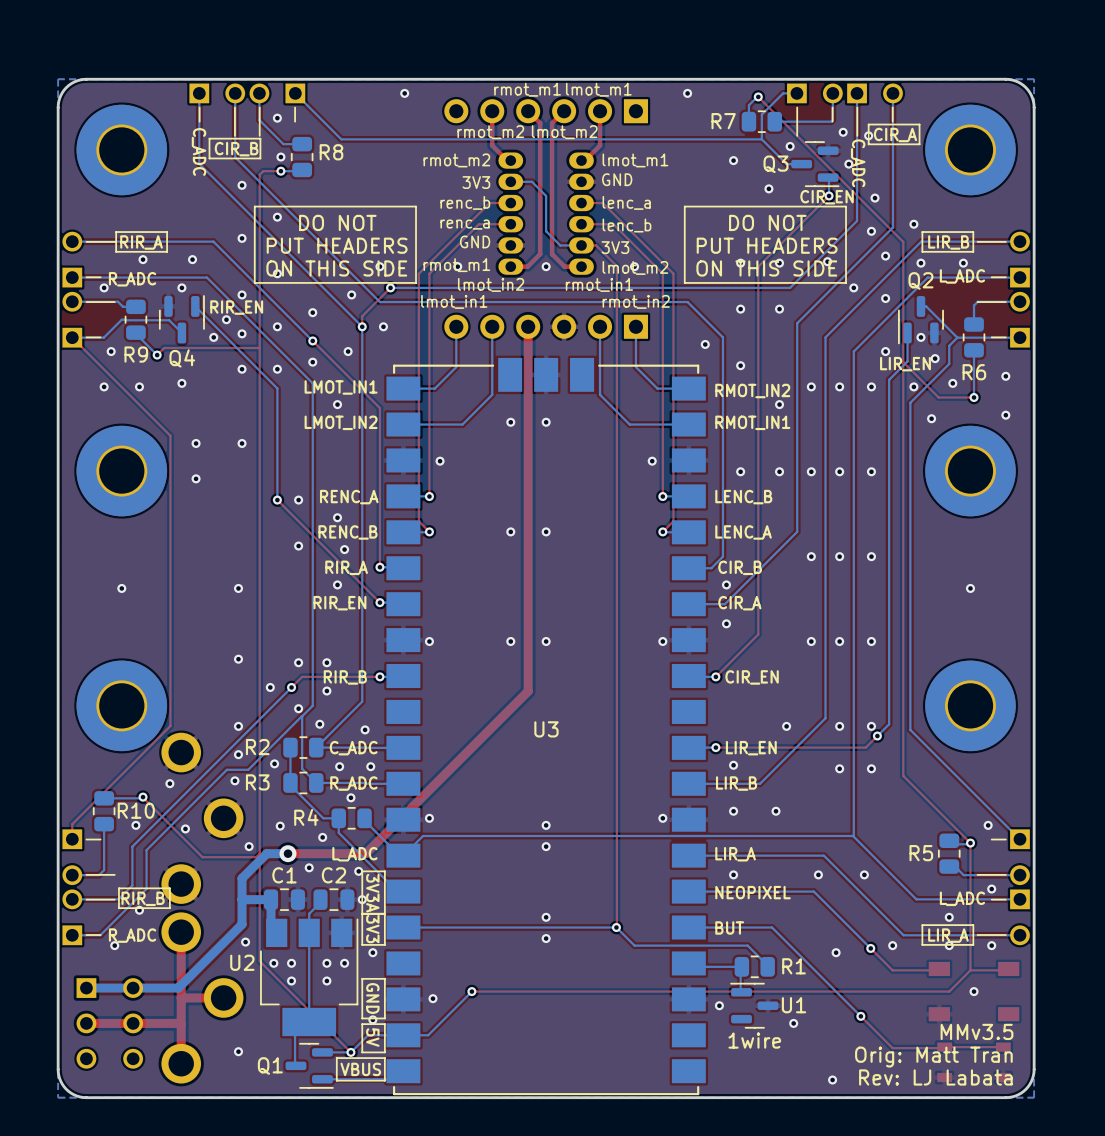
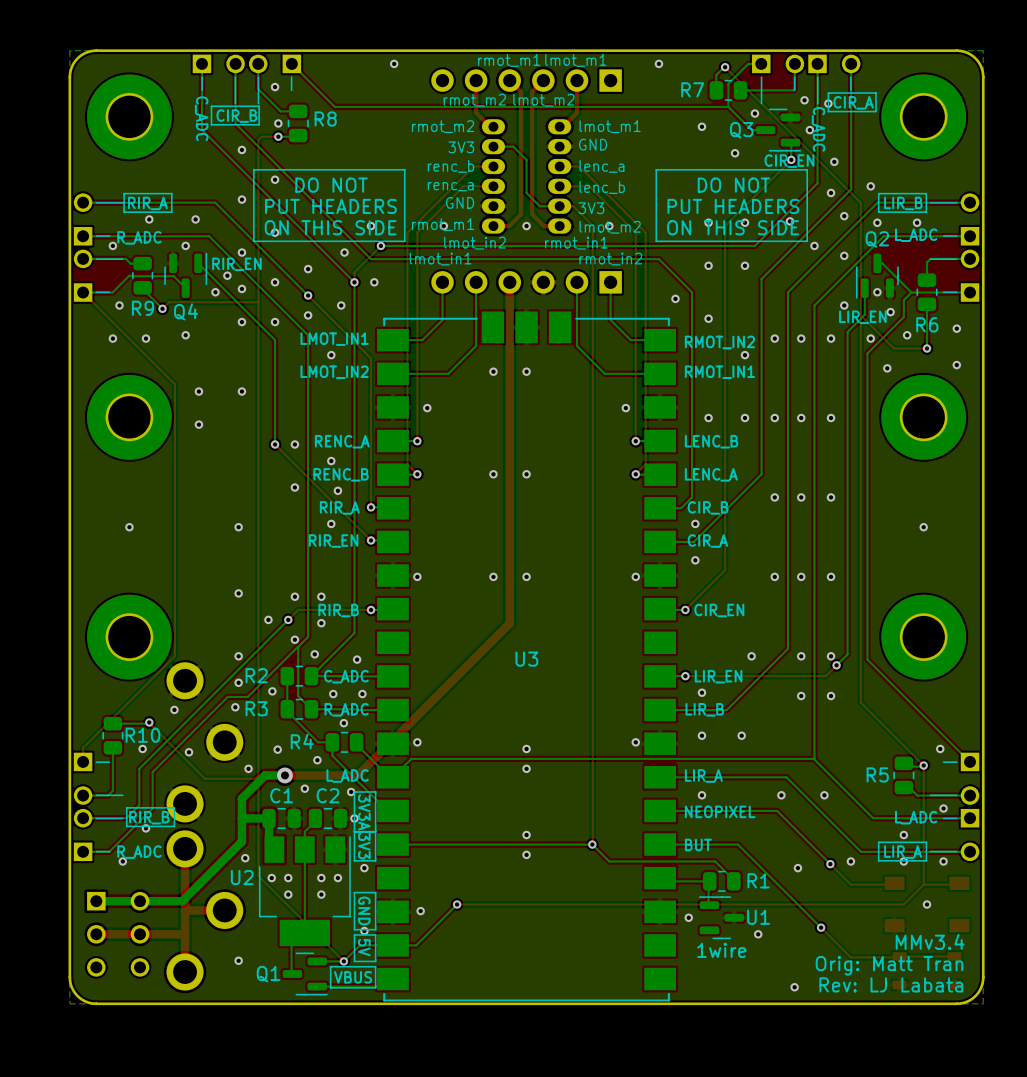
text: MMv3.5 (977, 1031) -> MMv3.4 (930, 941)

